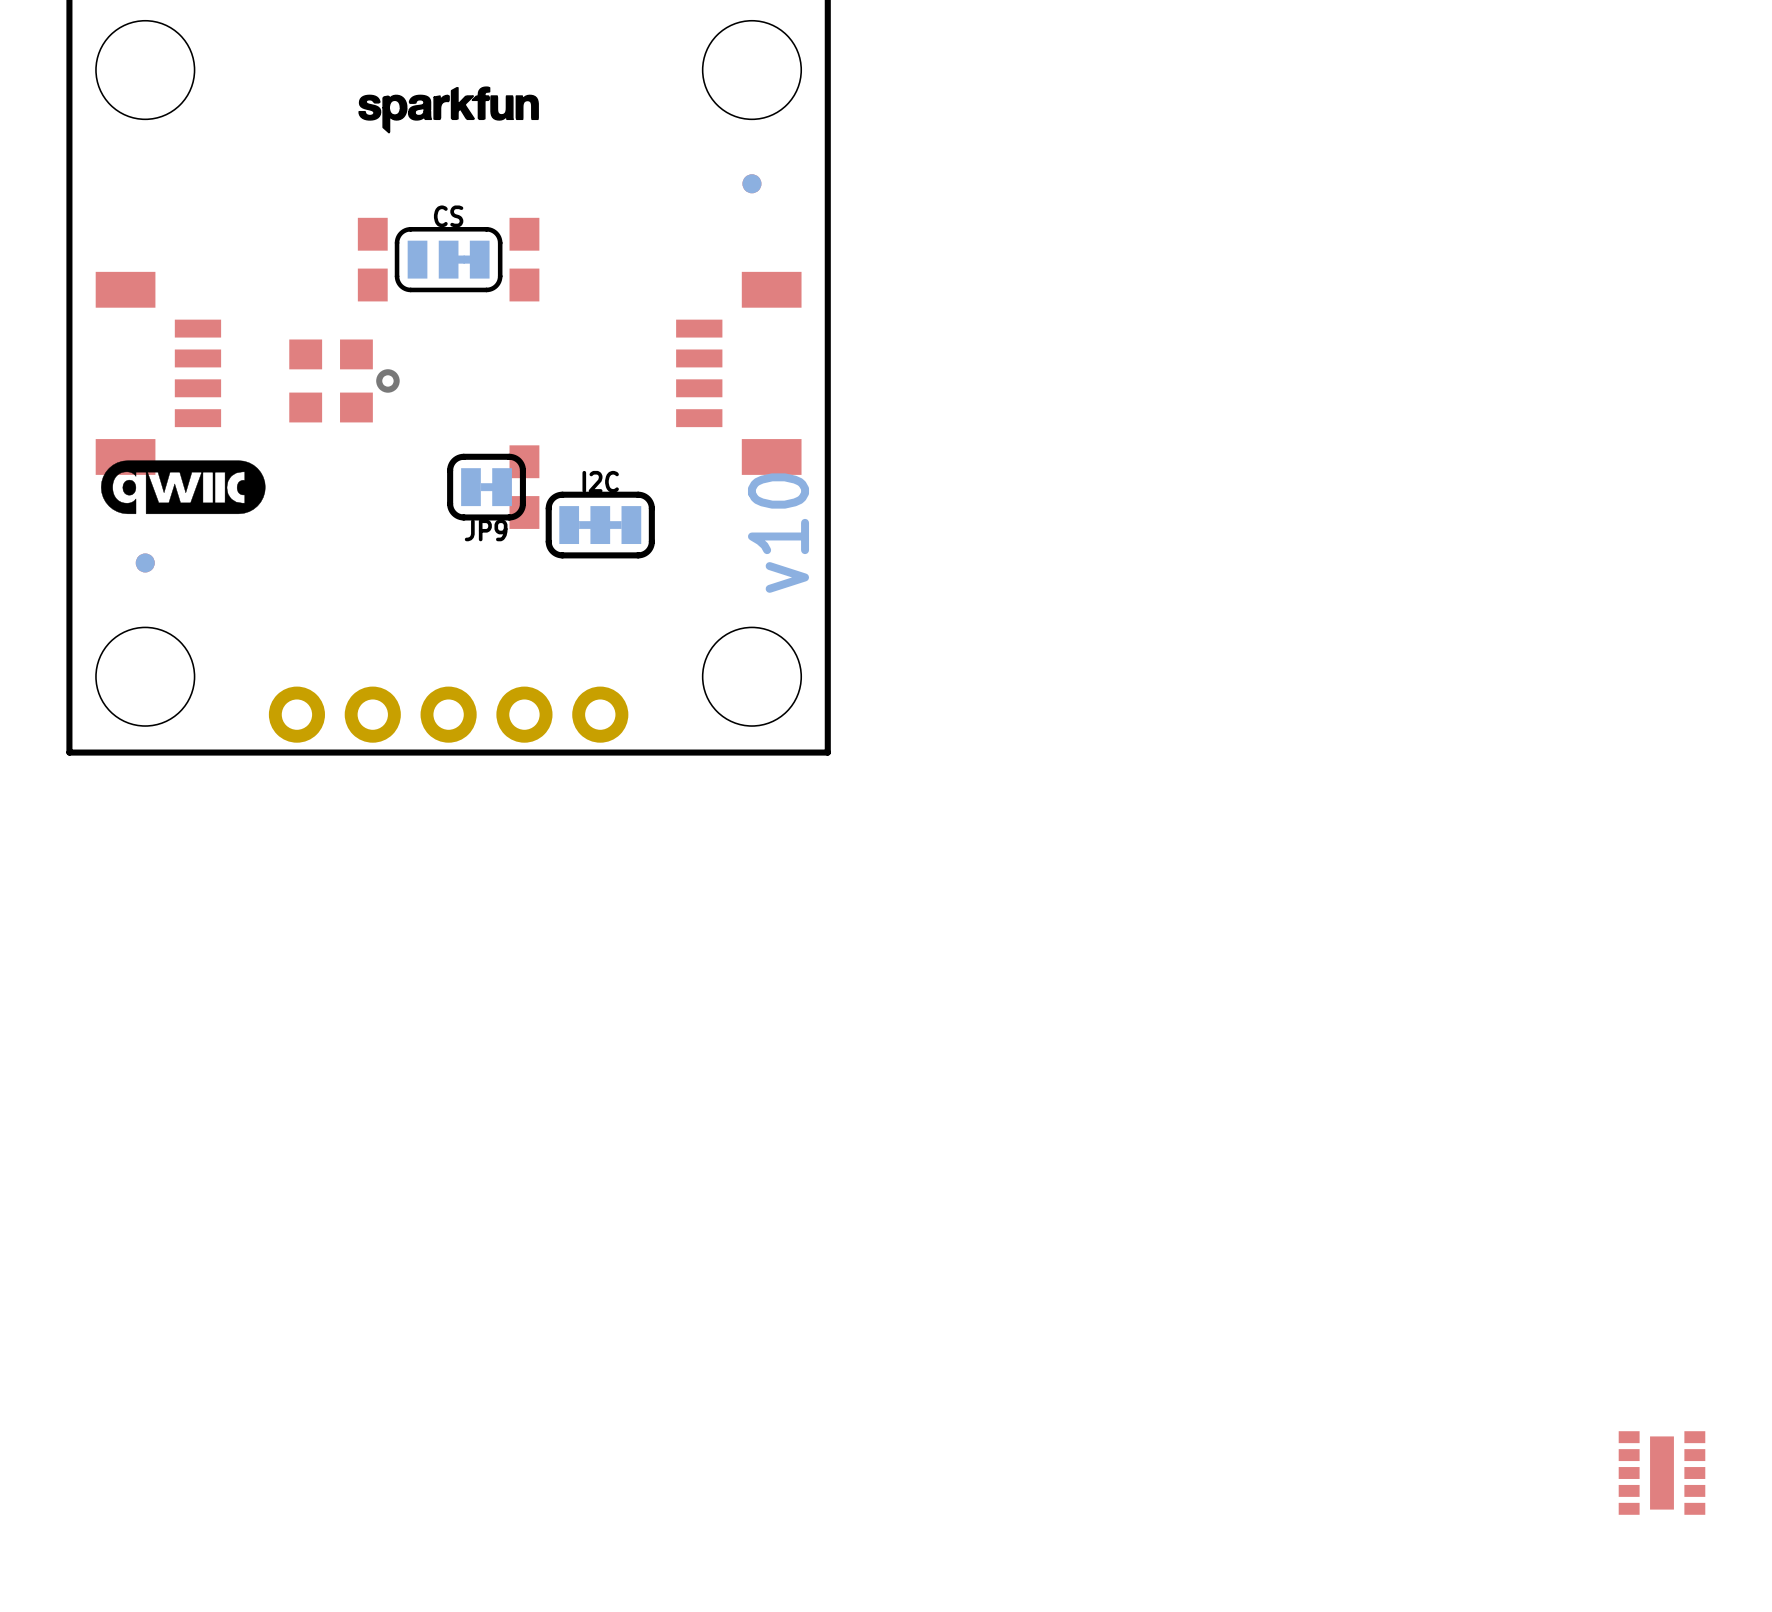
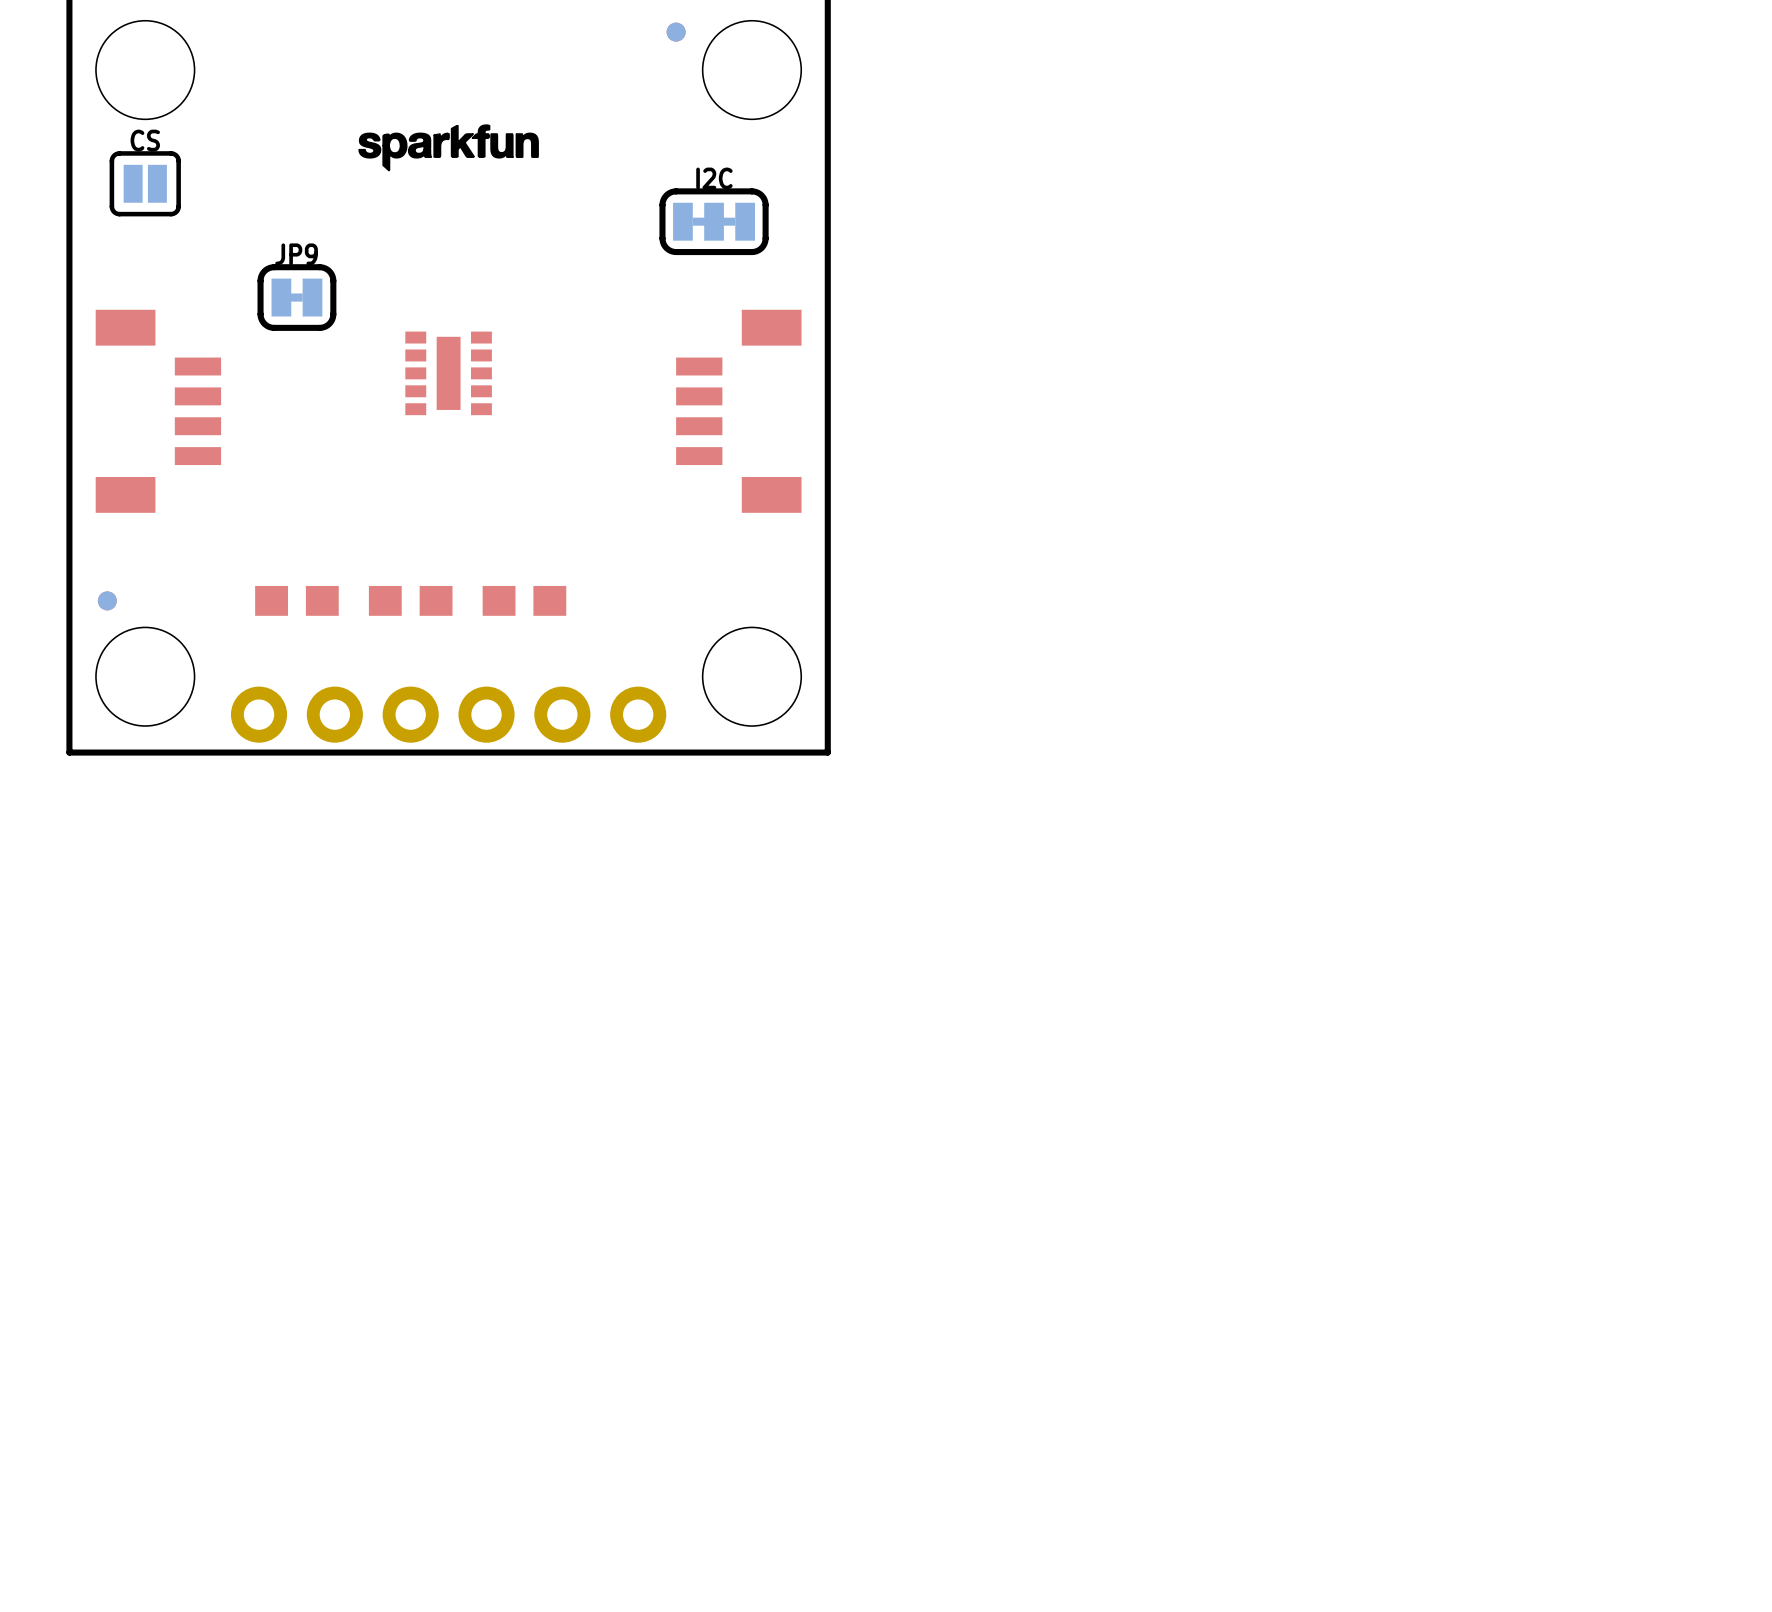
drawing position: (448, 109) -> (448, 147)
CS: none -> (145, 183)
part position: (751, 183) -> (676, 32)
part: (372, 259) -> none
CS: (448, 259) -> none
part: (524, 259) -> none
part: (331, 354) -> none
part position: (158, 373) -> (158, 411)
part: none -> (448, 373)
part position: (738, 373) -> (738, 411)
via: (387, 380) -> none
part: (331, 407) -> none
drawing: [101, 460, 266, 515] -> none
JP9 rotation: 0° (486, 487) -> 180° (296, 297)
JP9 position: (486, 487) -> (296, 297)
part: (524, 487) -> none
I2C position: (600, 525) -> (714, 221)
text: v10 (778, 533) -> none
part position: (145, 562) -> (107, 600)
part: none -> (296, 600)
part: none -> (410, 600)
part: none -> (524, 600)
part: none -> (259, 714)
part: (296, 714) -> none
part: none -> (334, 714)
part position: (486, 714) -> (524, 714)
part: (1661, 1473) -> none

